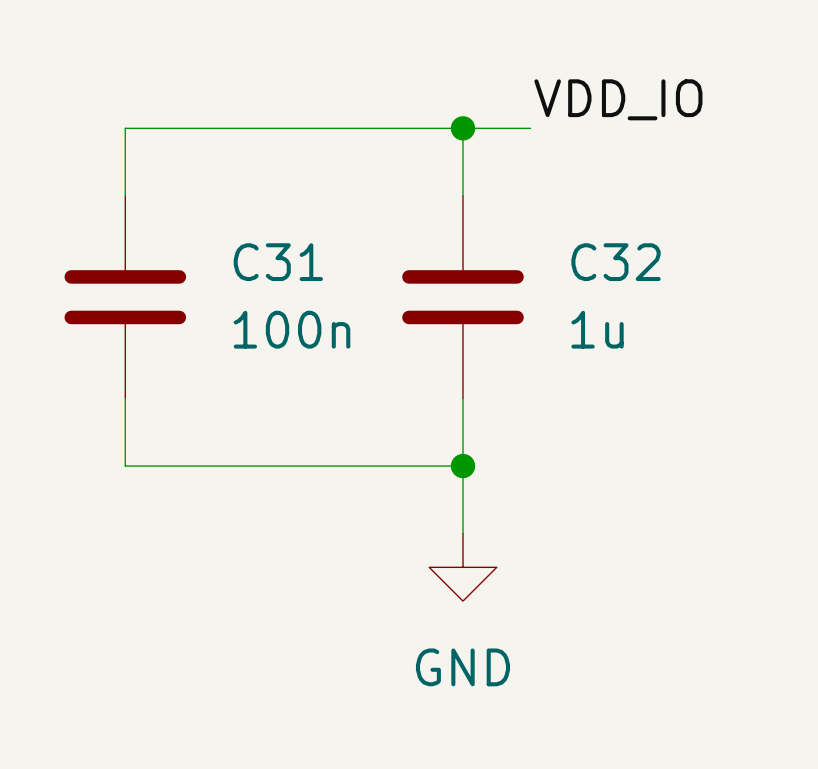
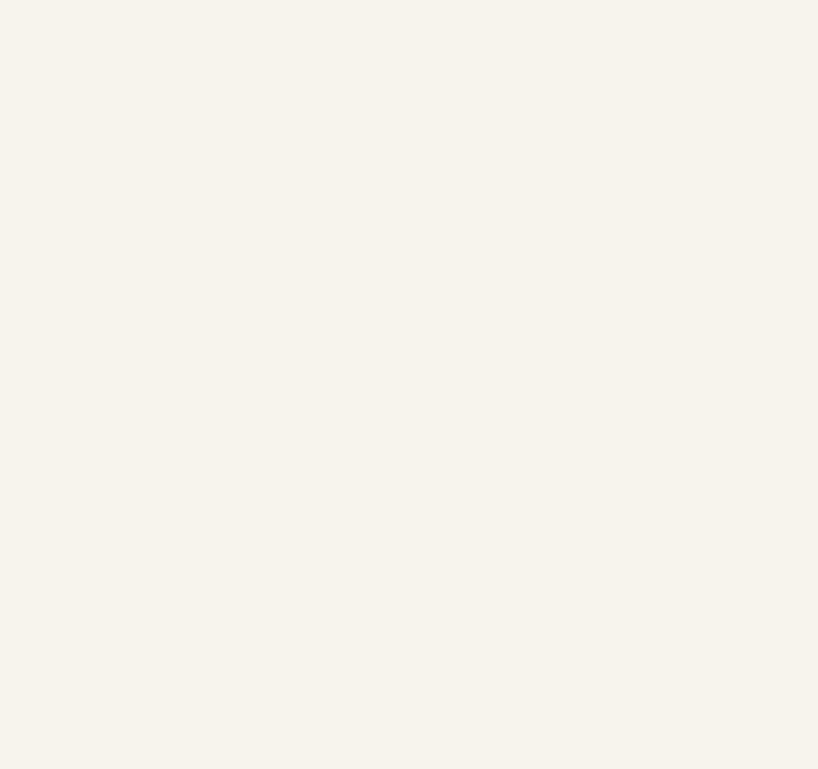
label: VDD_IO (618, 99) -> none
wire: (462, 128) (462, 195) -> none
junction: (462, 128) -> none
wire: (530, 128) (125, 128) (125, 195) -> none
C31: 100n (125, 297) -> none
C32: 1u (462, 297) -> none
wire: (125, 398) (125, 466) (462, 466) -> none
wire: (462, 398) (462, 533) -> none
junction: (462, 466) -> none
power symbol: GND (462, 567) -> none

